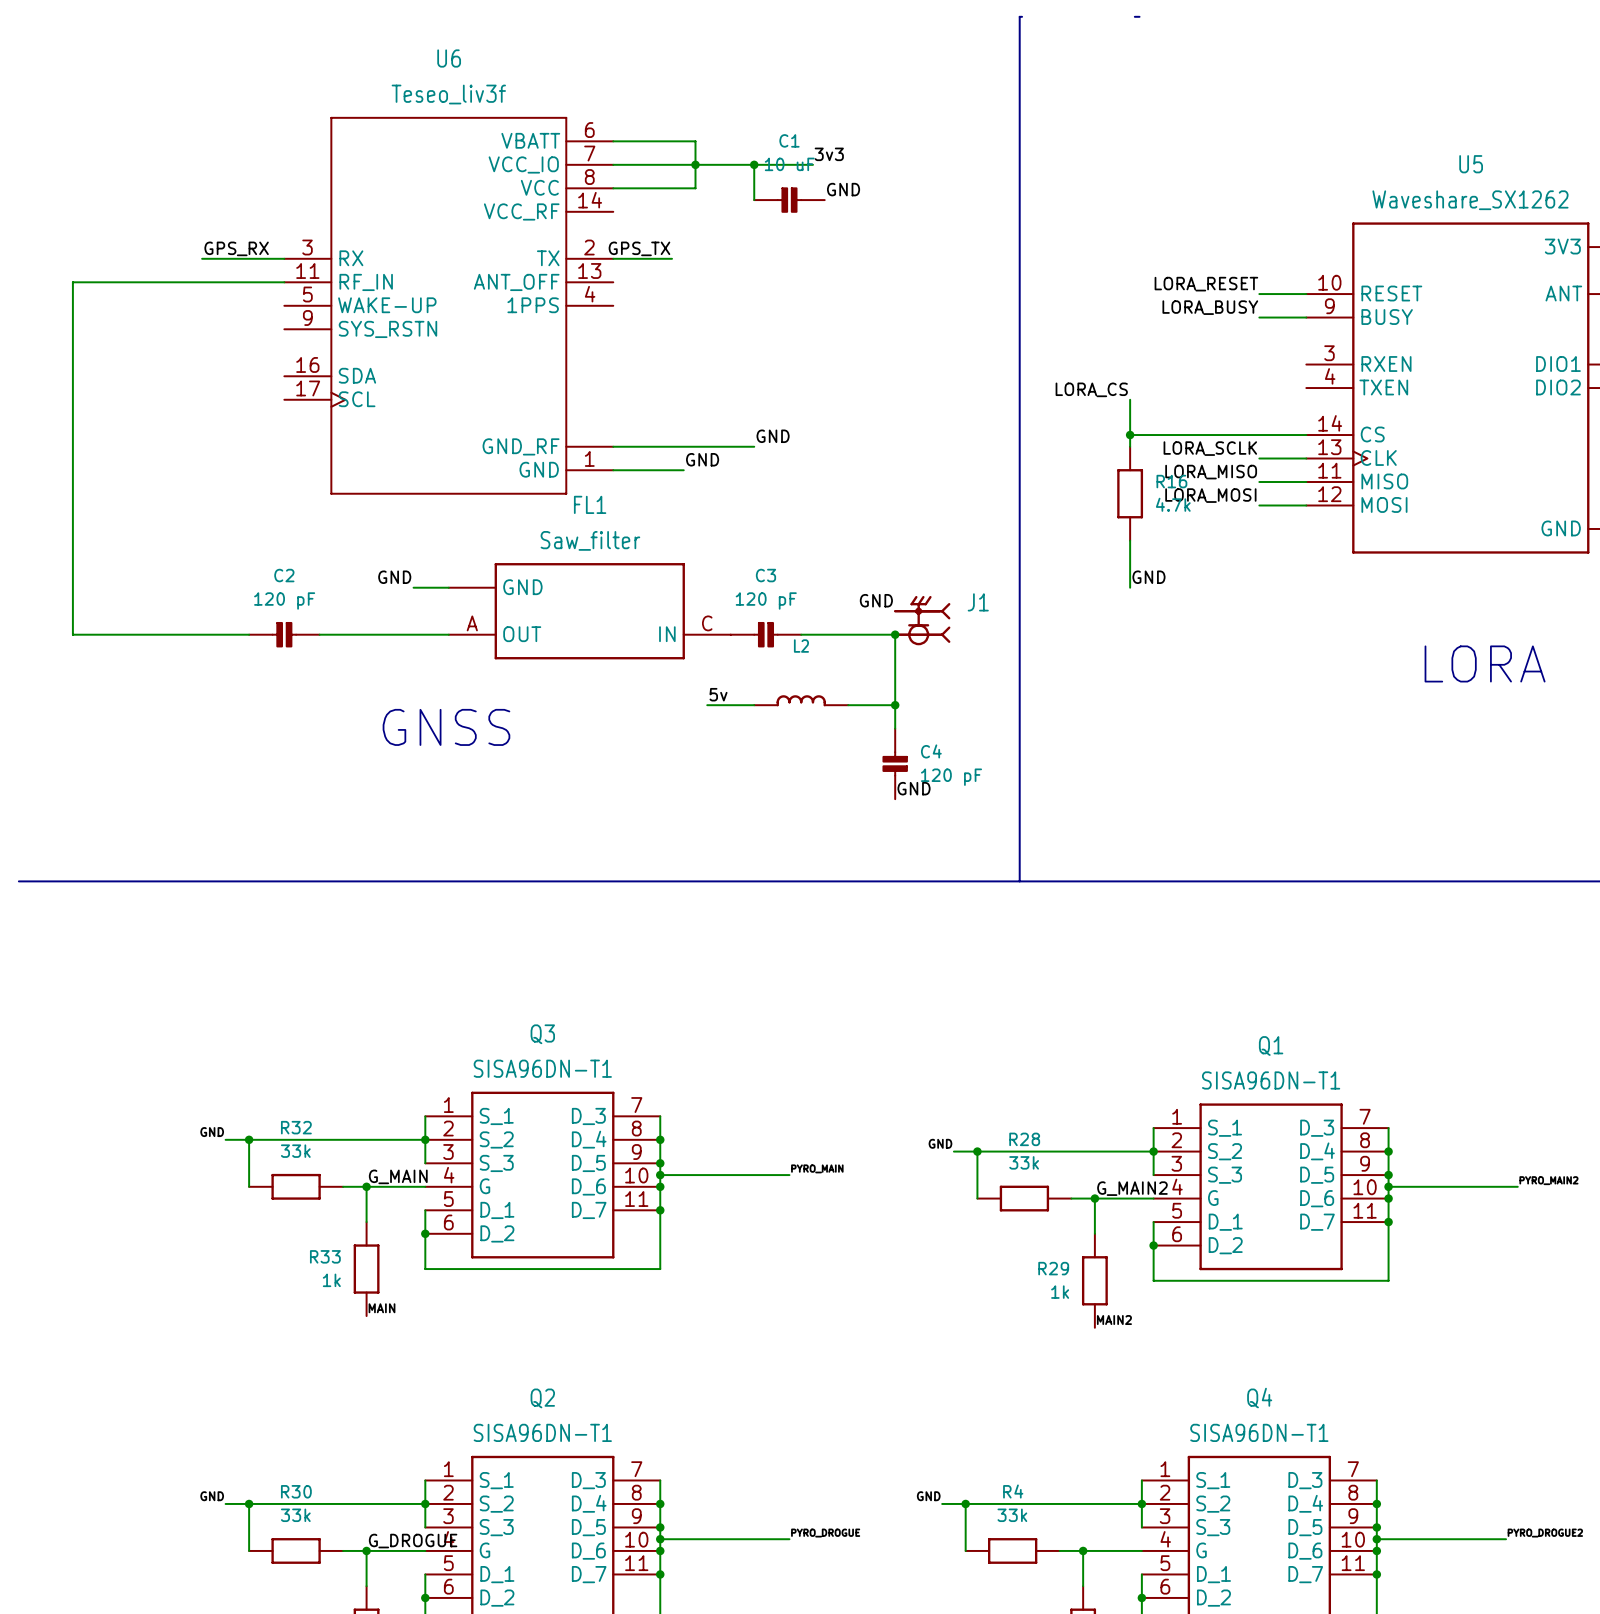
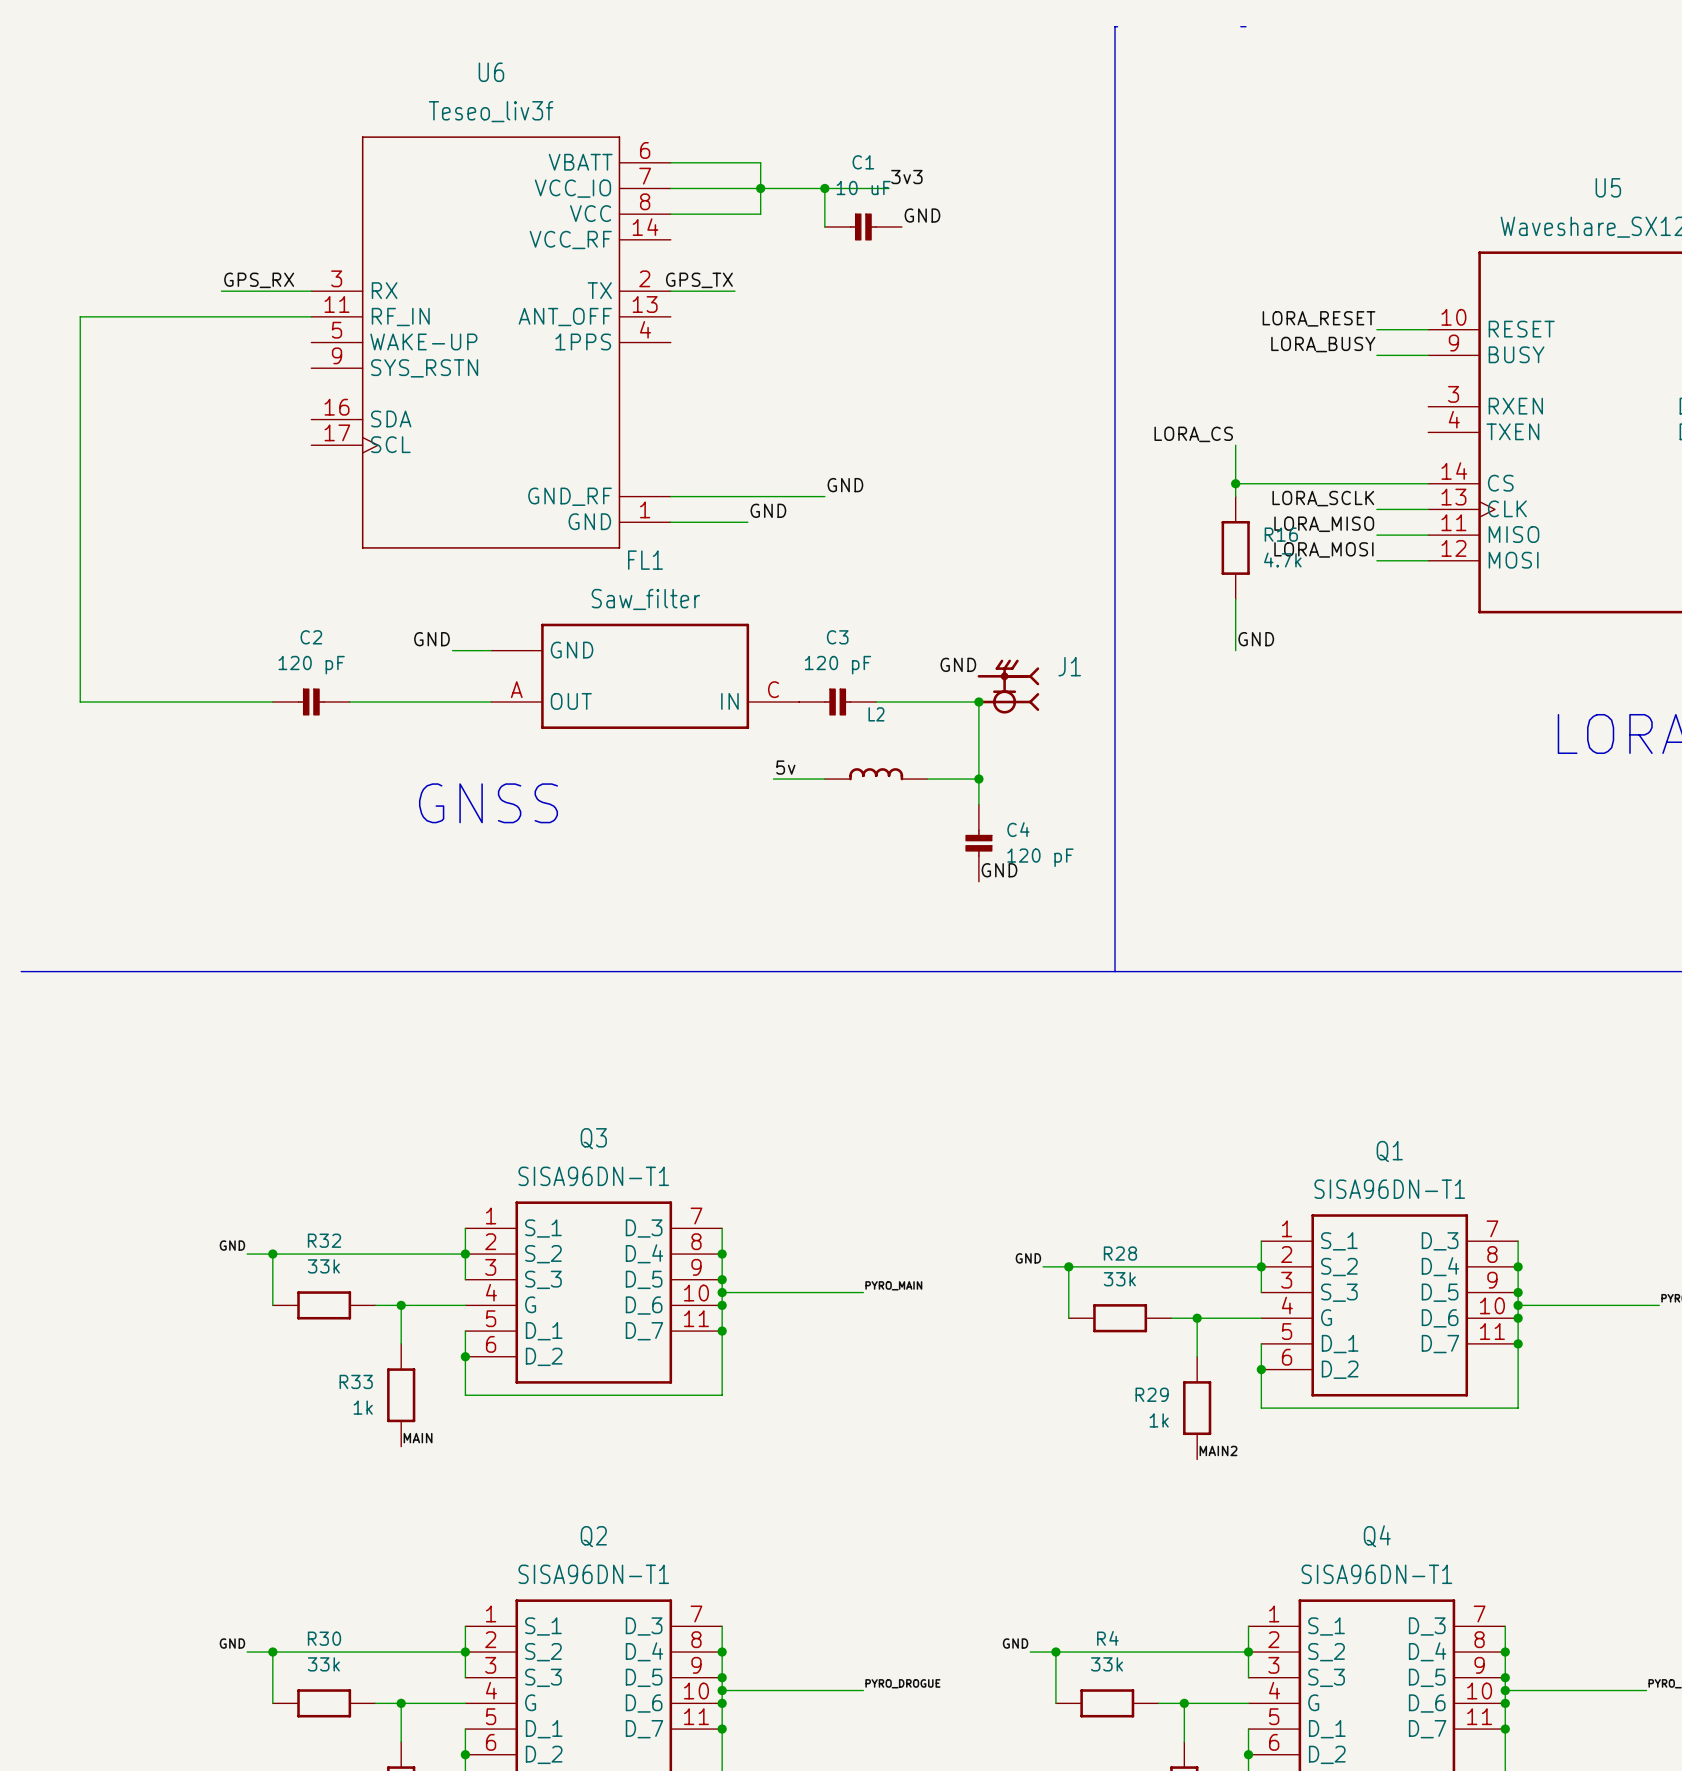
label: G_MAIN (398, 1176) -> none
label: G_MAIN2 (1132, 1188) -> none
label: G_DROGUE (413, 1541) -> none

